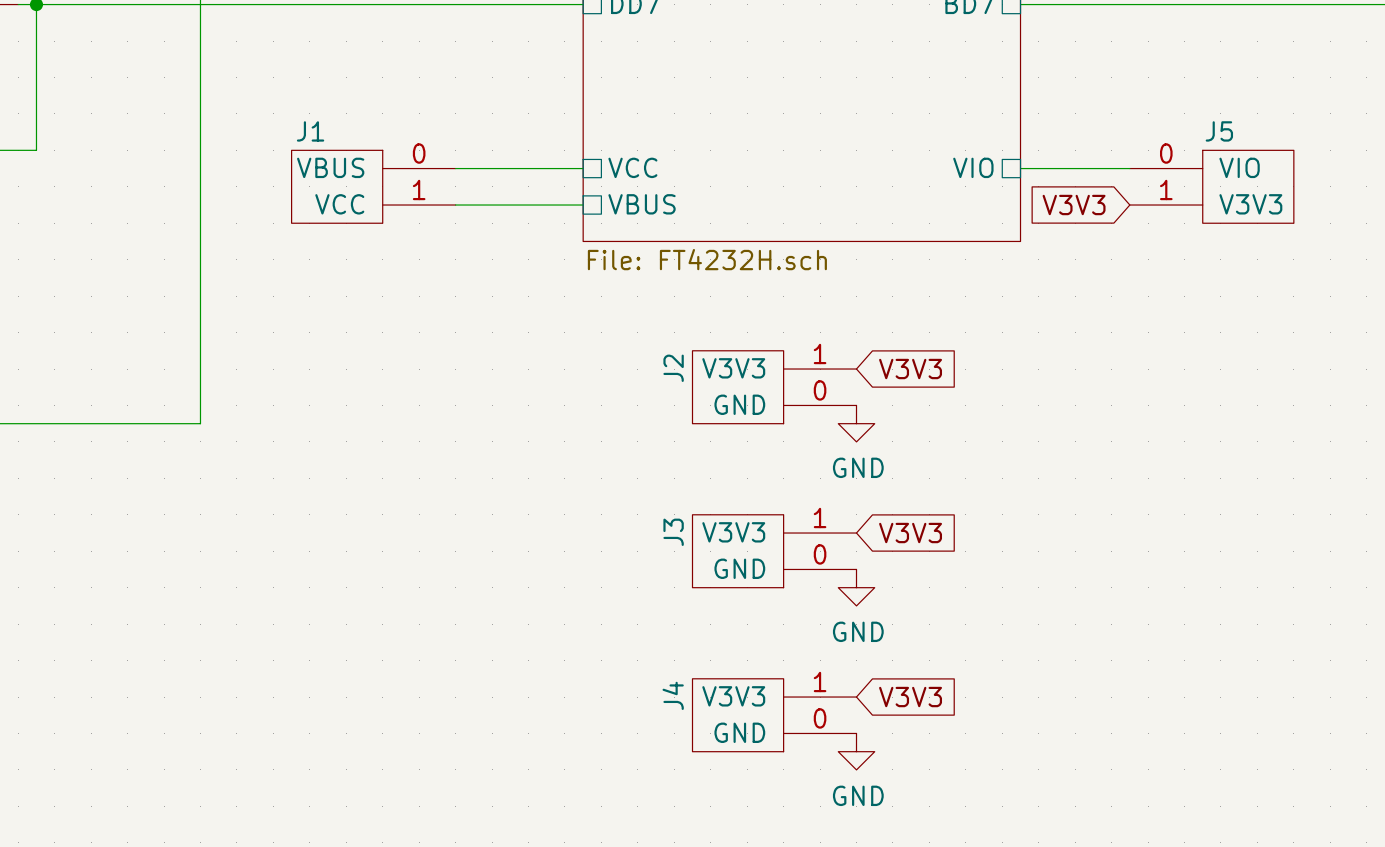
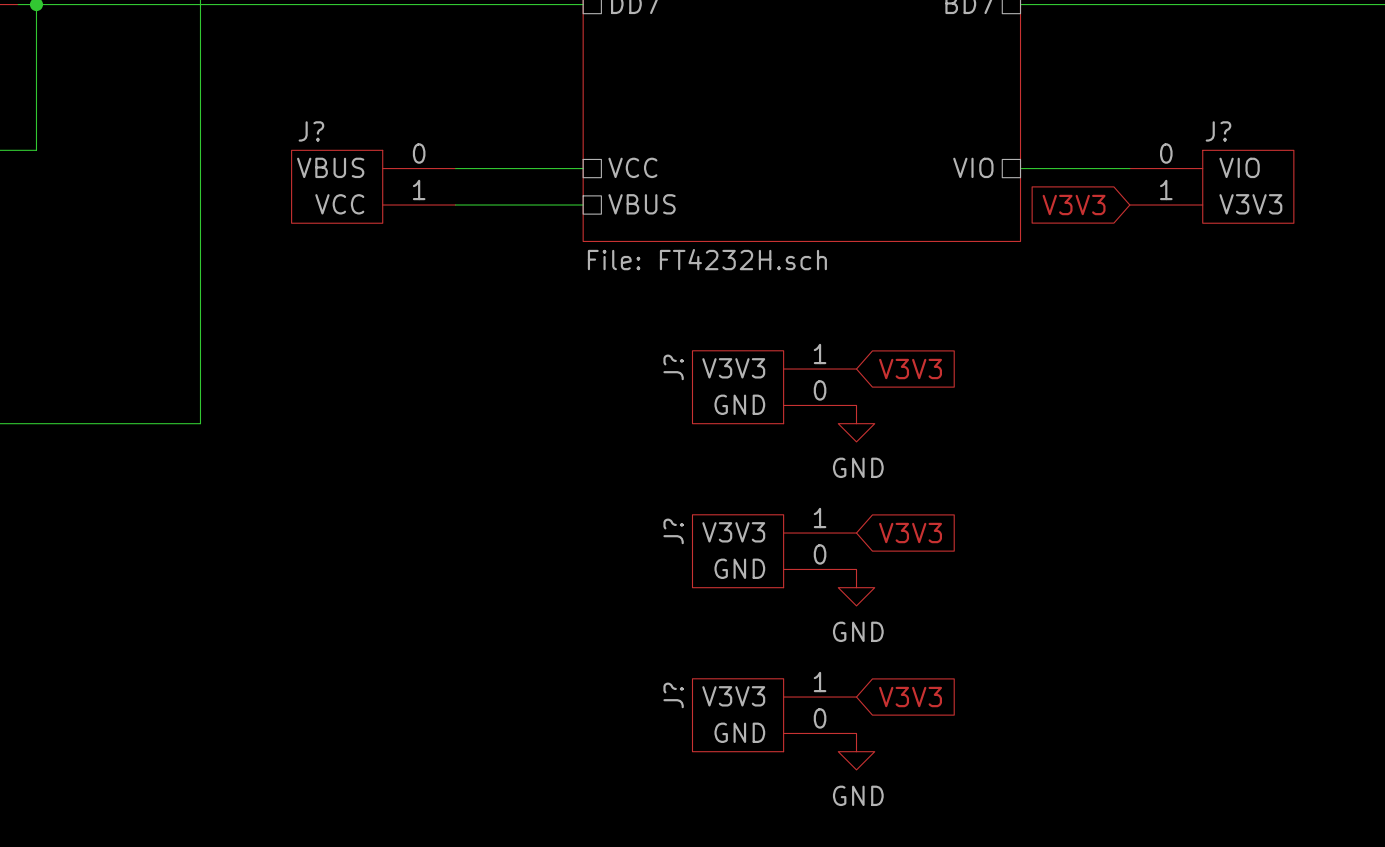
J1 name: J1 (310, 131) -> J? (311, 131)
J5 name: J5 (1219, 131) -> J? (1218, 131)
J2 name: J2 (673, 368) -> J? (673, 367)
J3 name: J3 (673, 532) -> J? (673, 531)
J4 name: J4 (673, 695) -> J? (673, 695)

